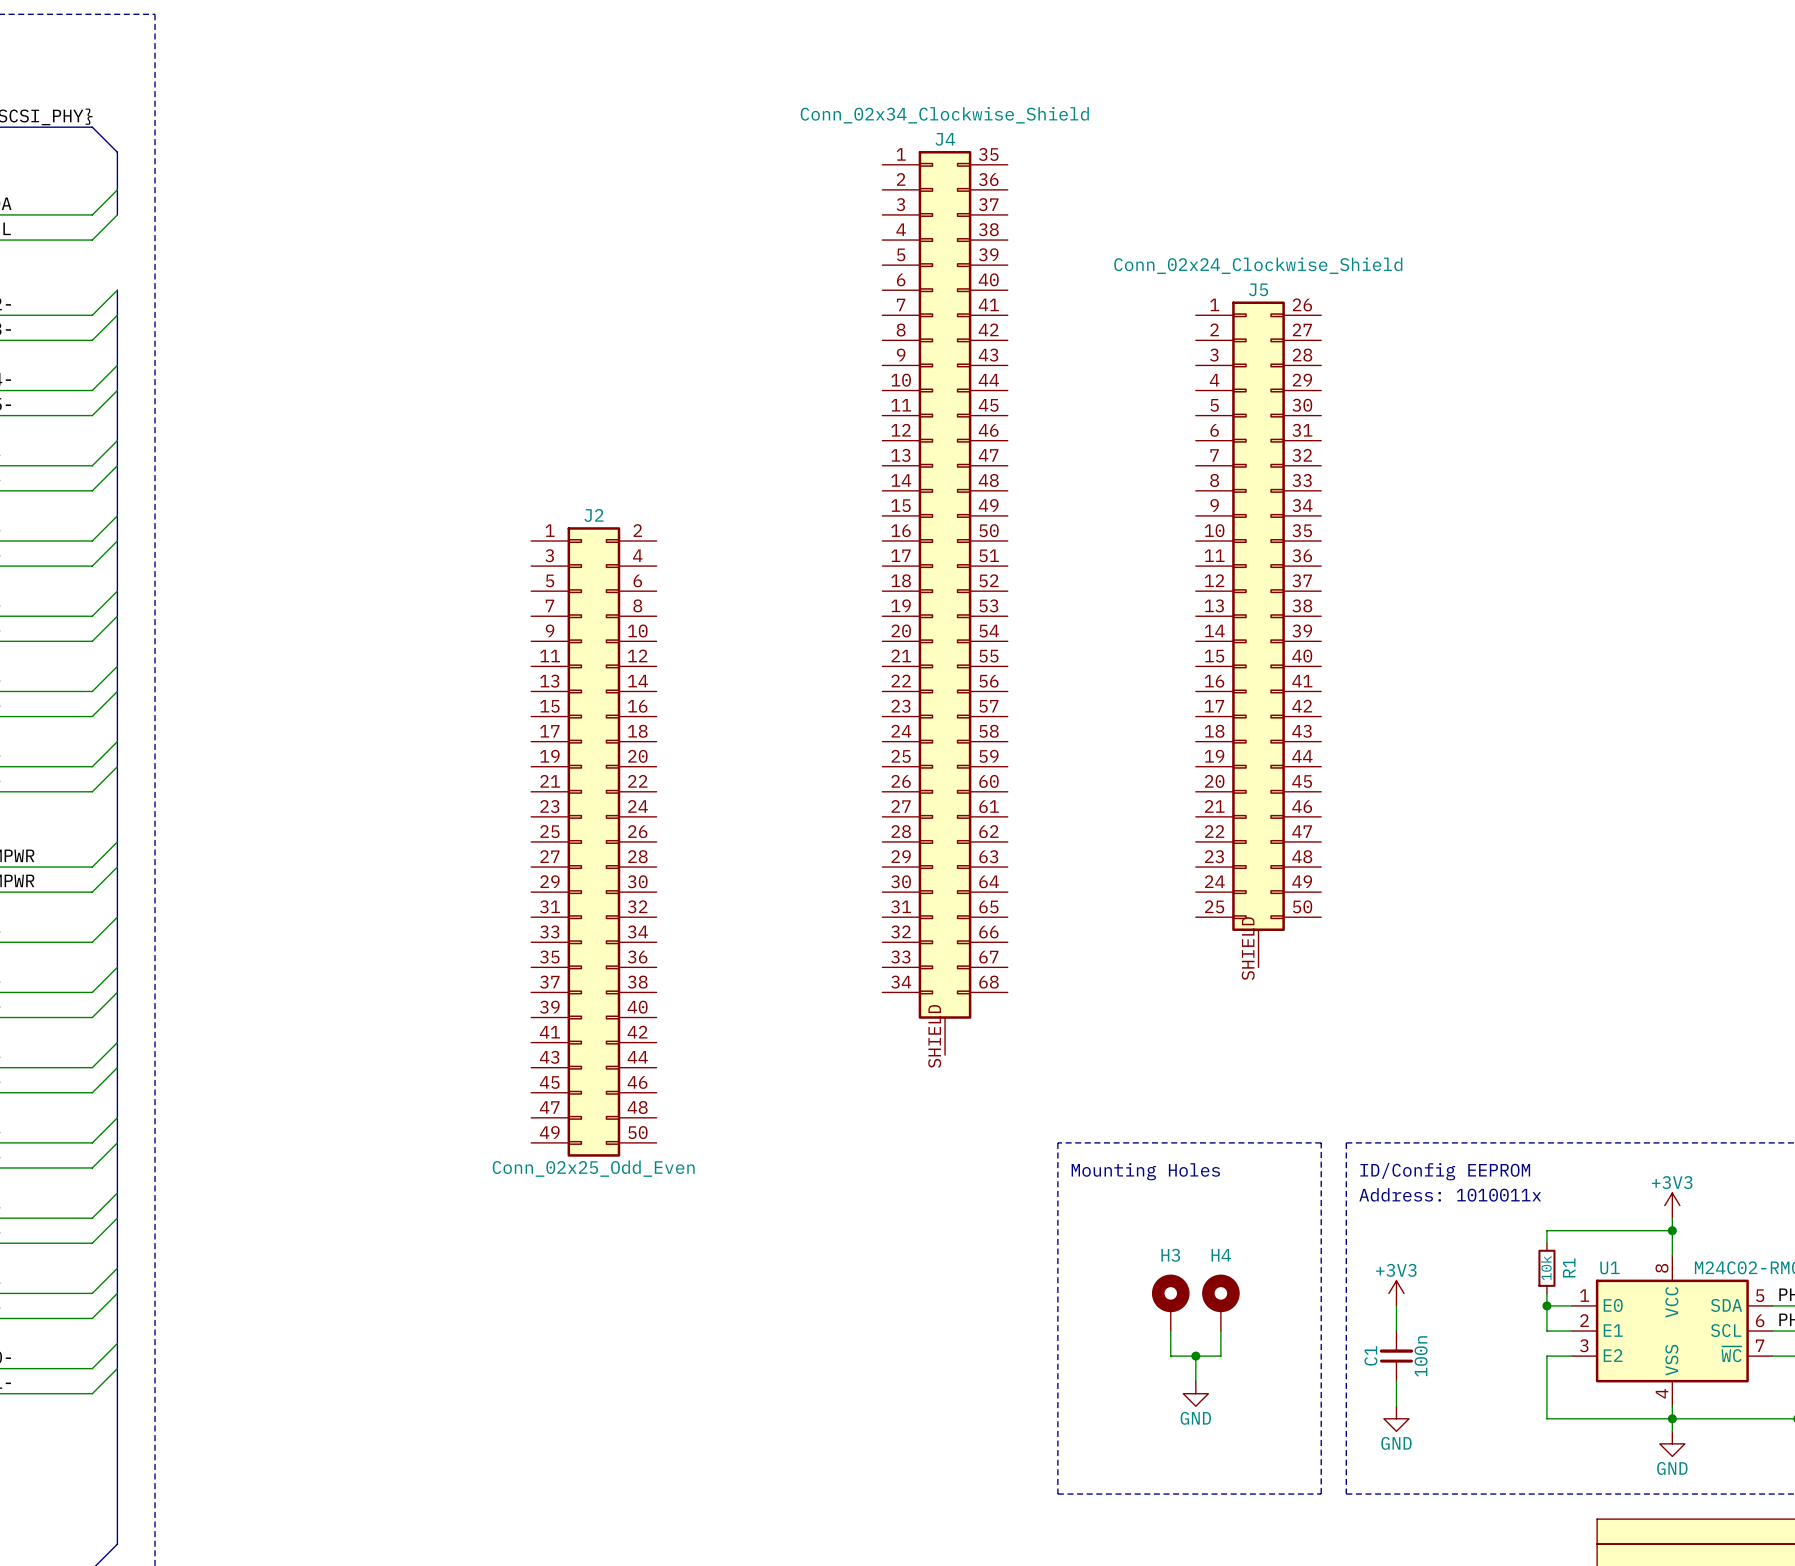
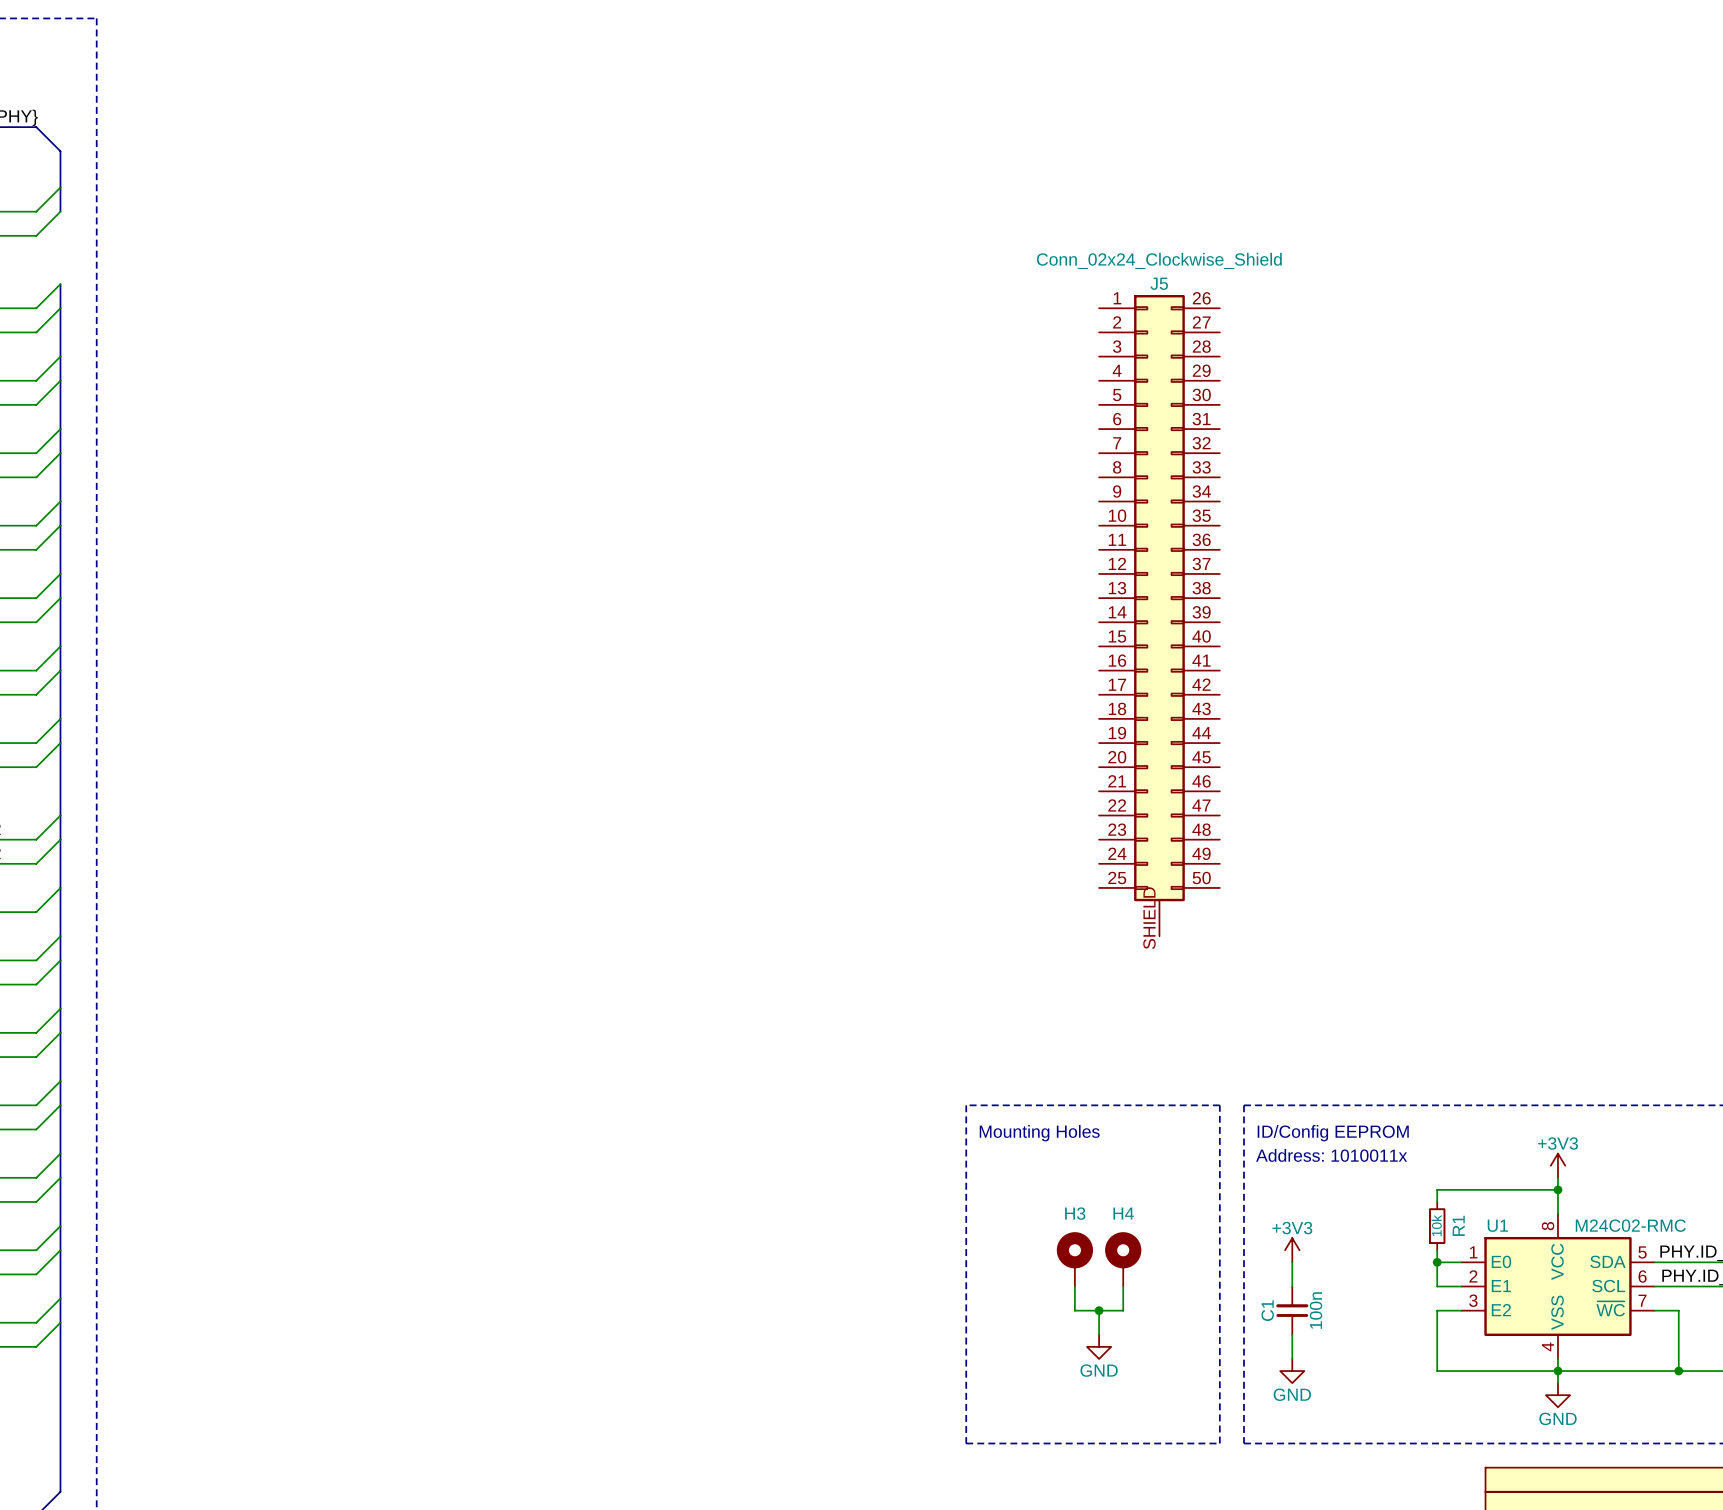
J4: Conn_02x34_Clockwise_Shield (945, 603) -> none
J2: Conn_02x25_Odd_Even (593, 841) -> none

